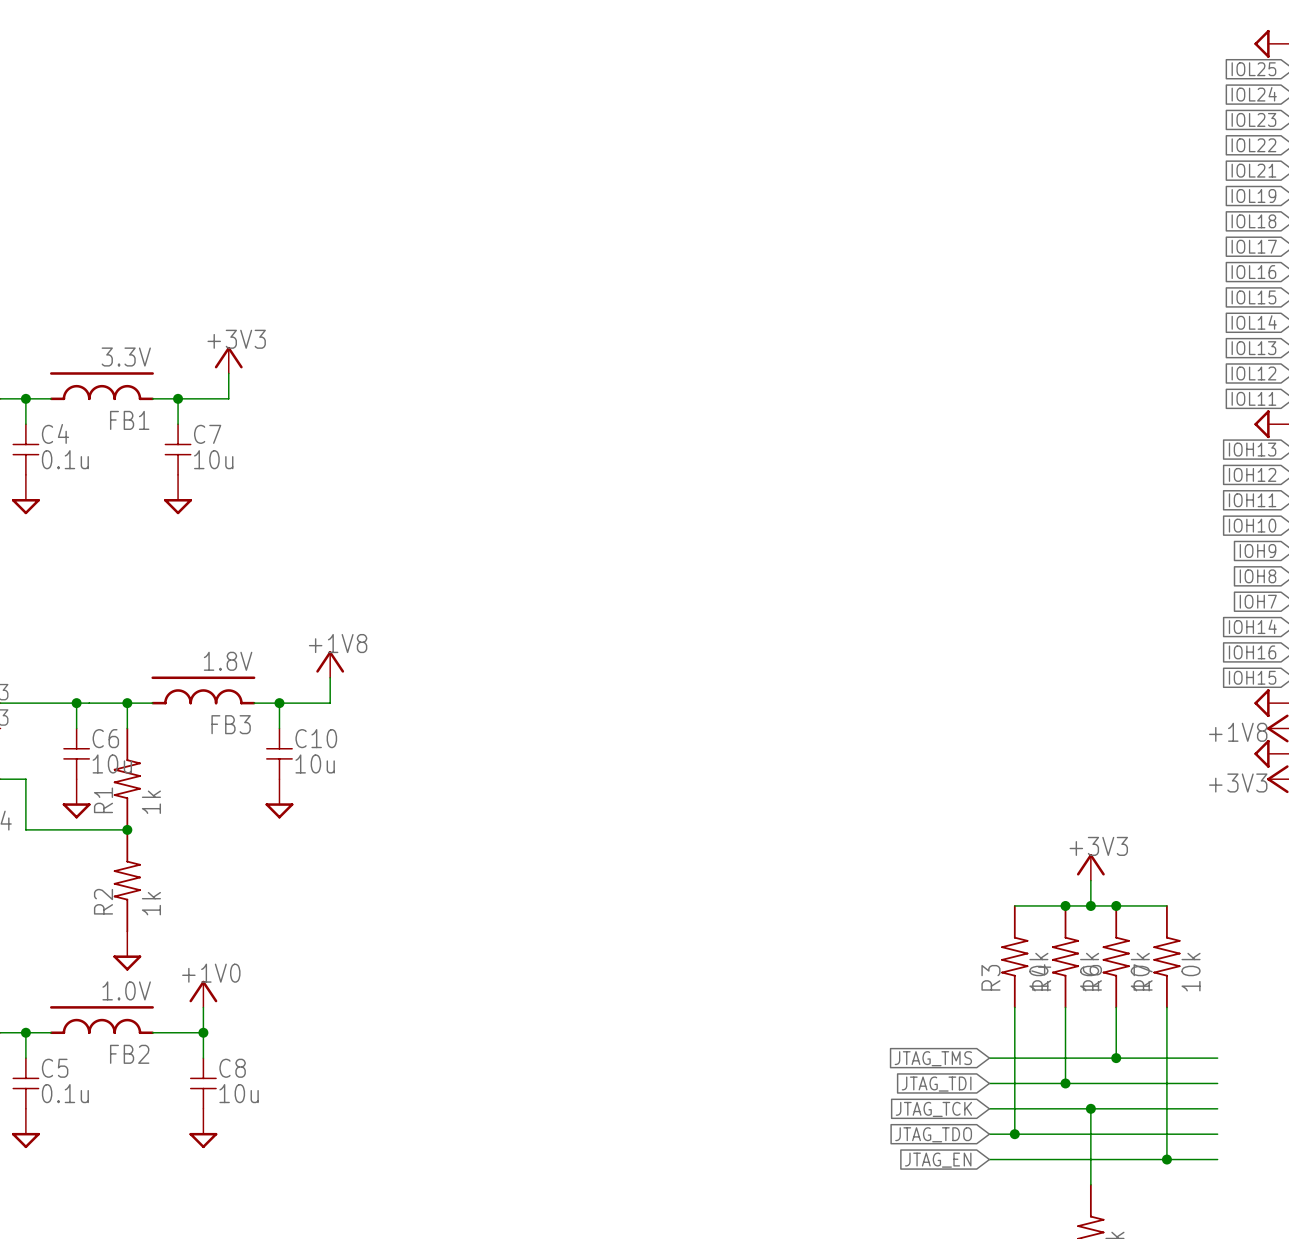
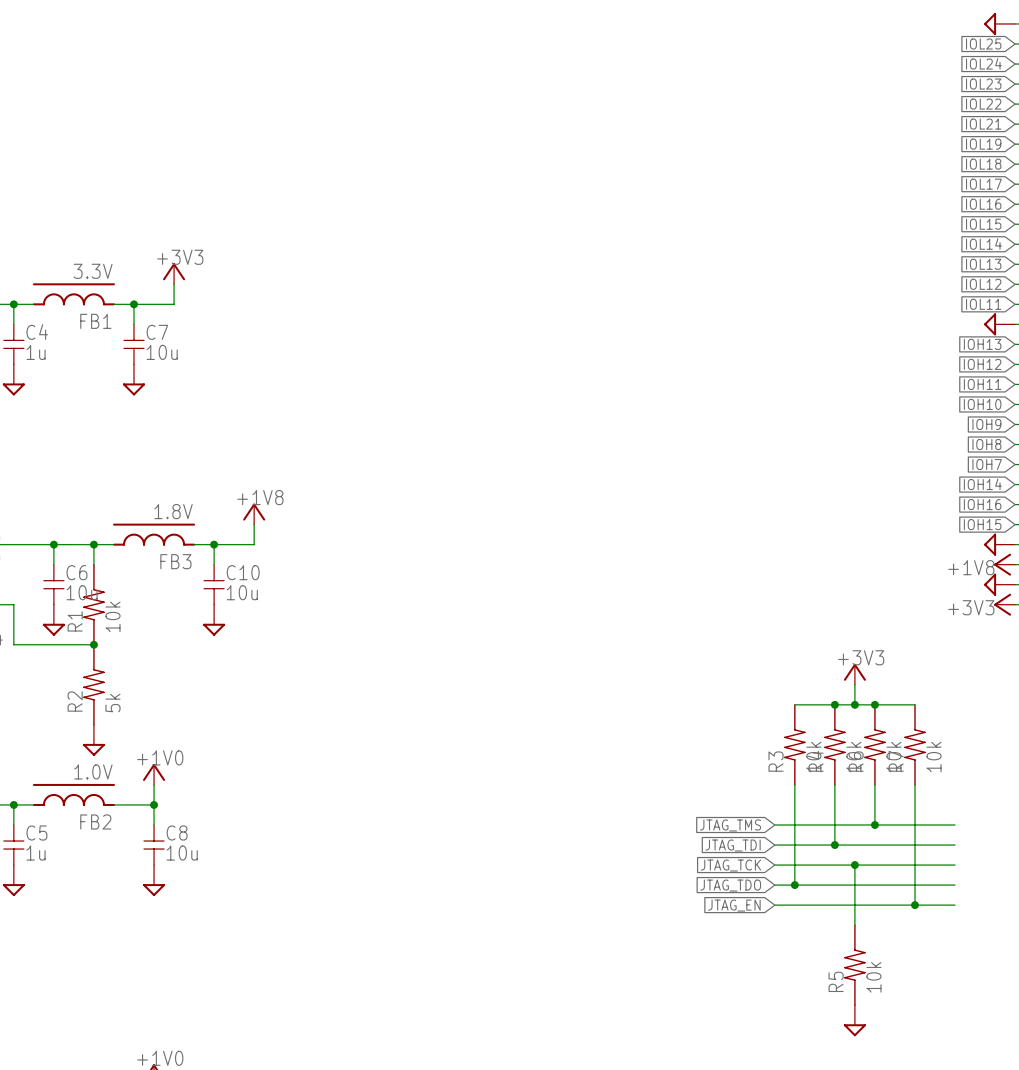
C4 value: 0.1u (65, 459) -> 1u (36, 352)
R1 value: 1k (151, 802) -> 10k (112, 616)
R2 value: 1k (151, 903) -> 5k (112, 703)
C5 value: 0.1u (65, 1093) -> 1u (36, 853)

